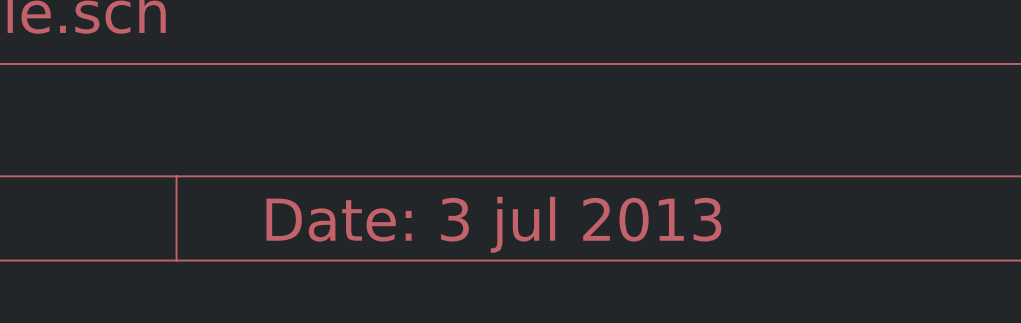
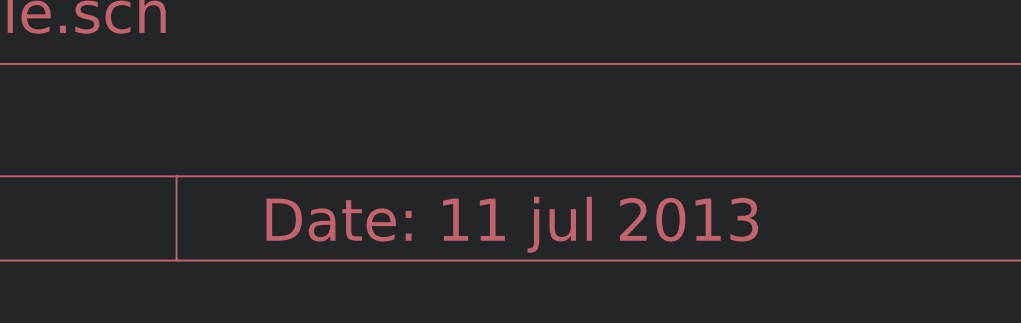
title block: Date: 3 jul 2013 (493, 224) -> Date: 11 jul 2013 (512, 224)

